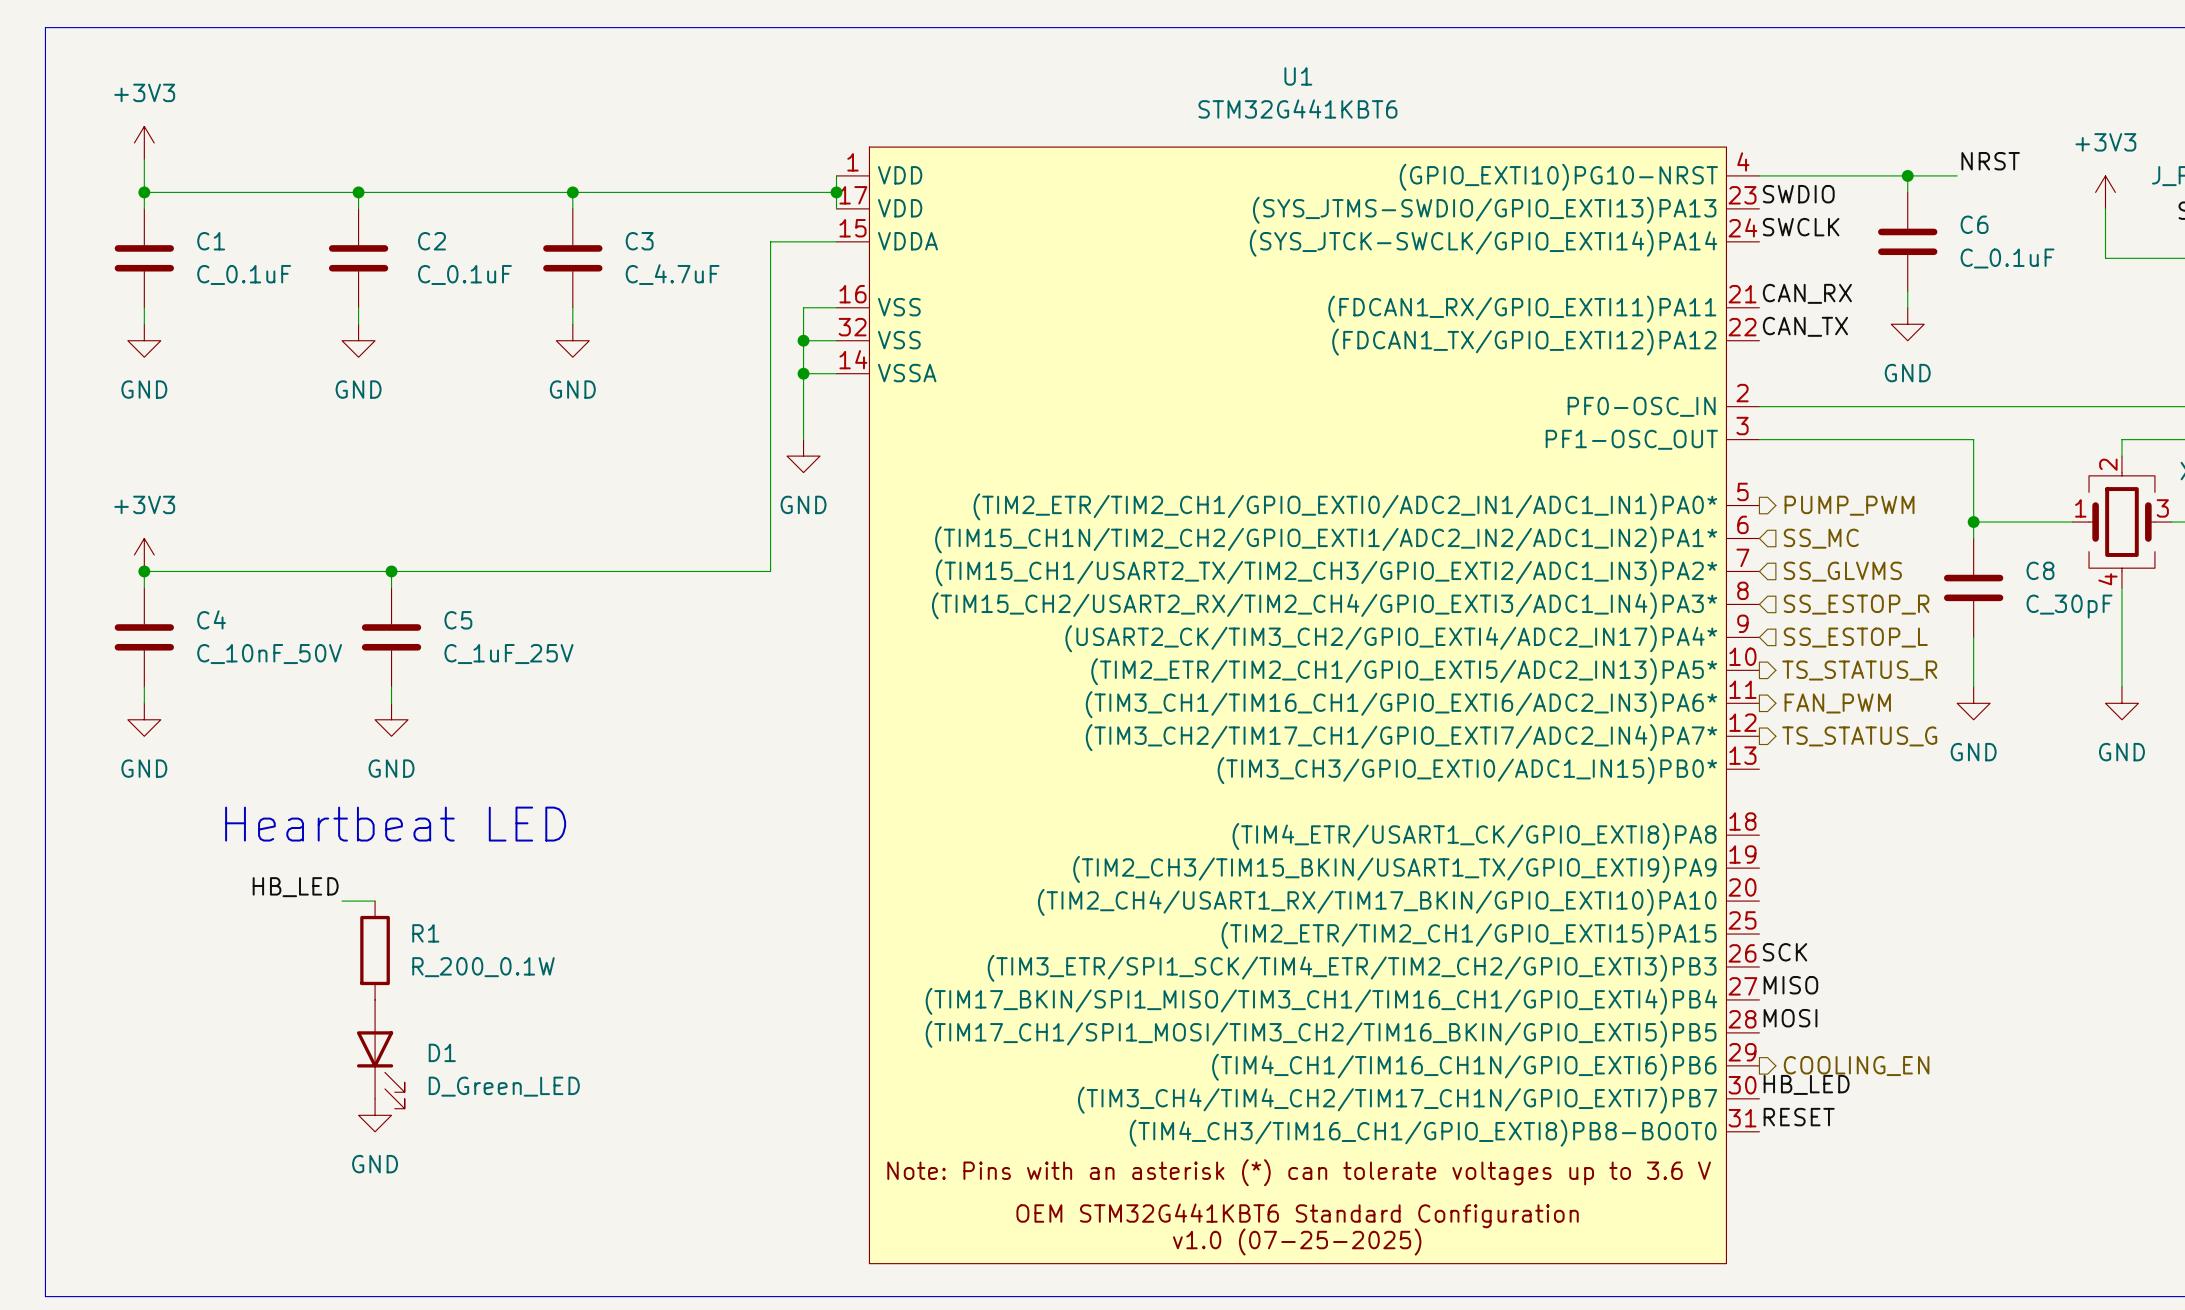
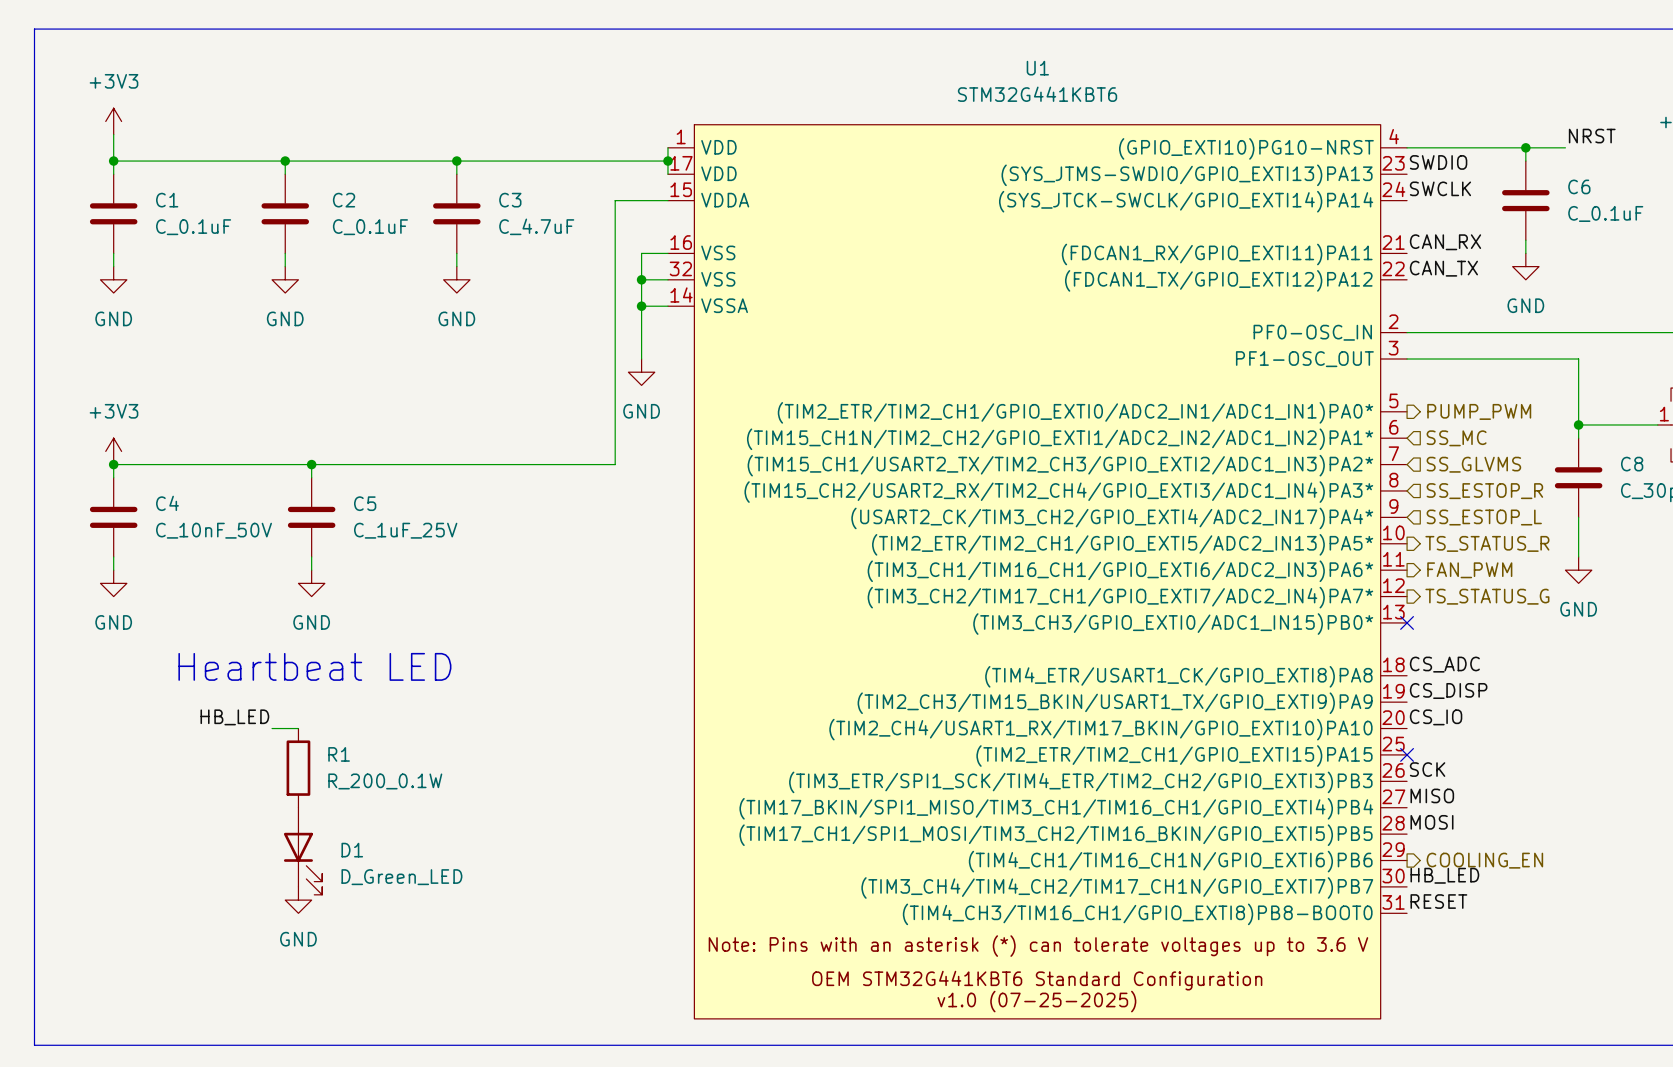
no-connect mark: none -> (1407, 622)
label: none -> CS_ADC (1444, 664)
label: none -> CS_DISP (1448, 690)
label: none -> CS_IO (1436, 717)
no-connect mark: none -> (1407, 754)

